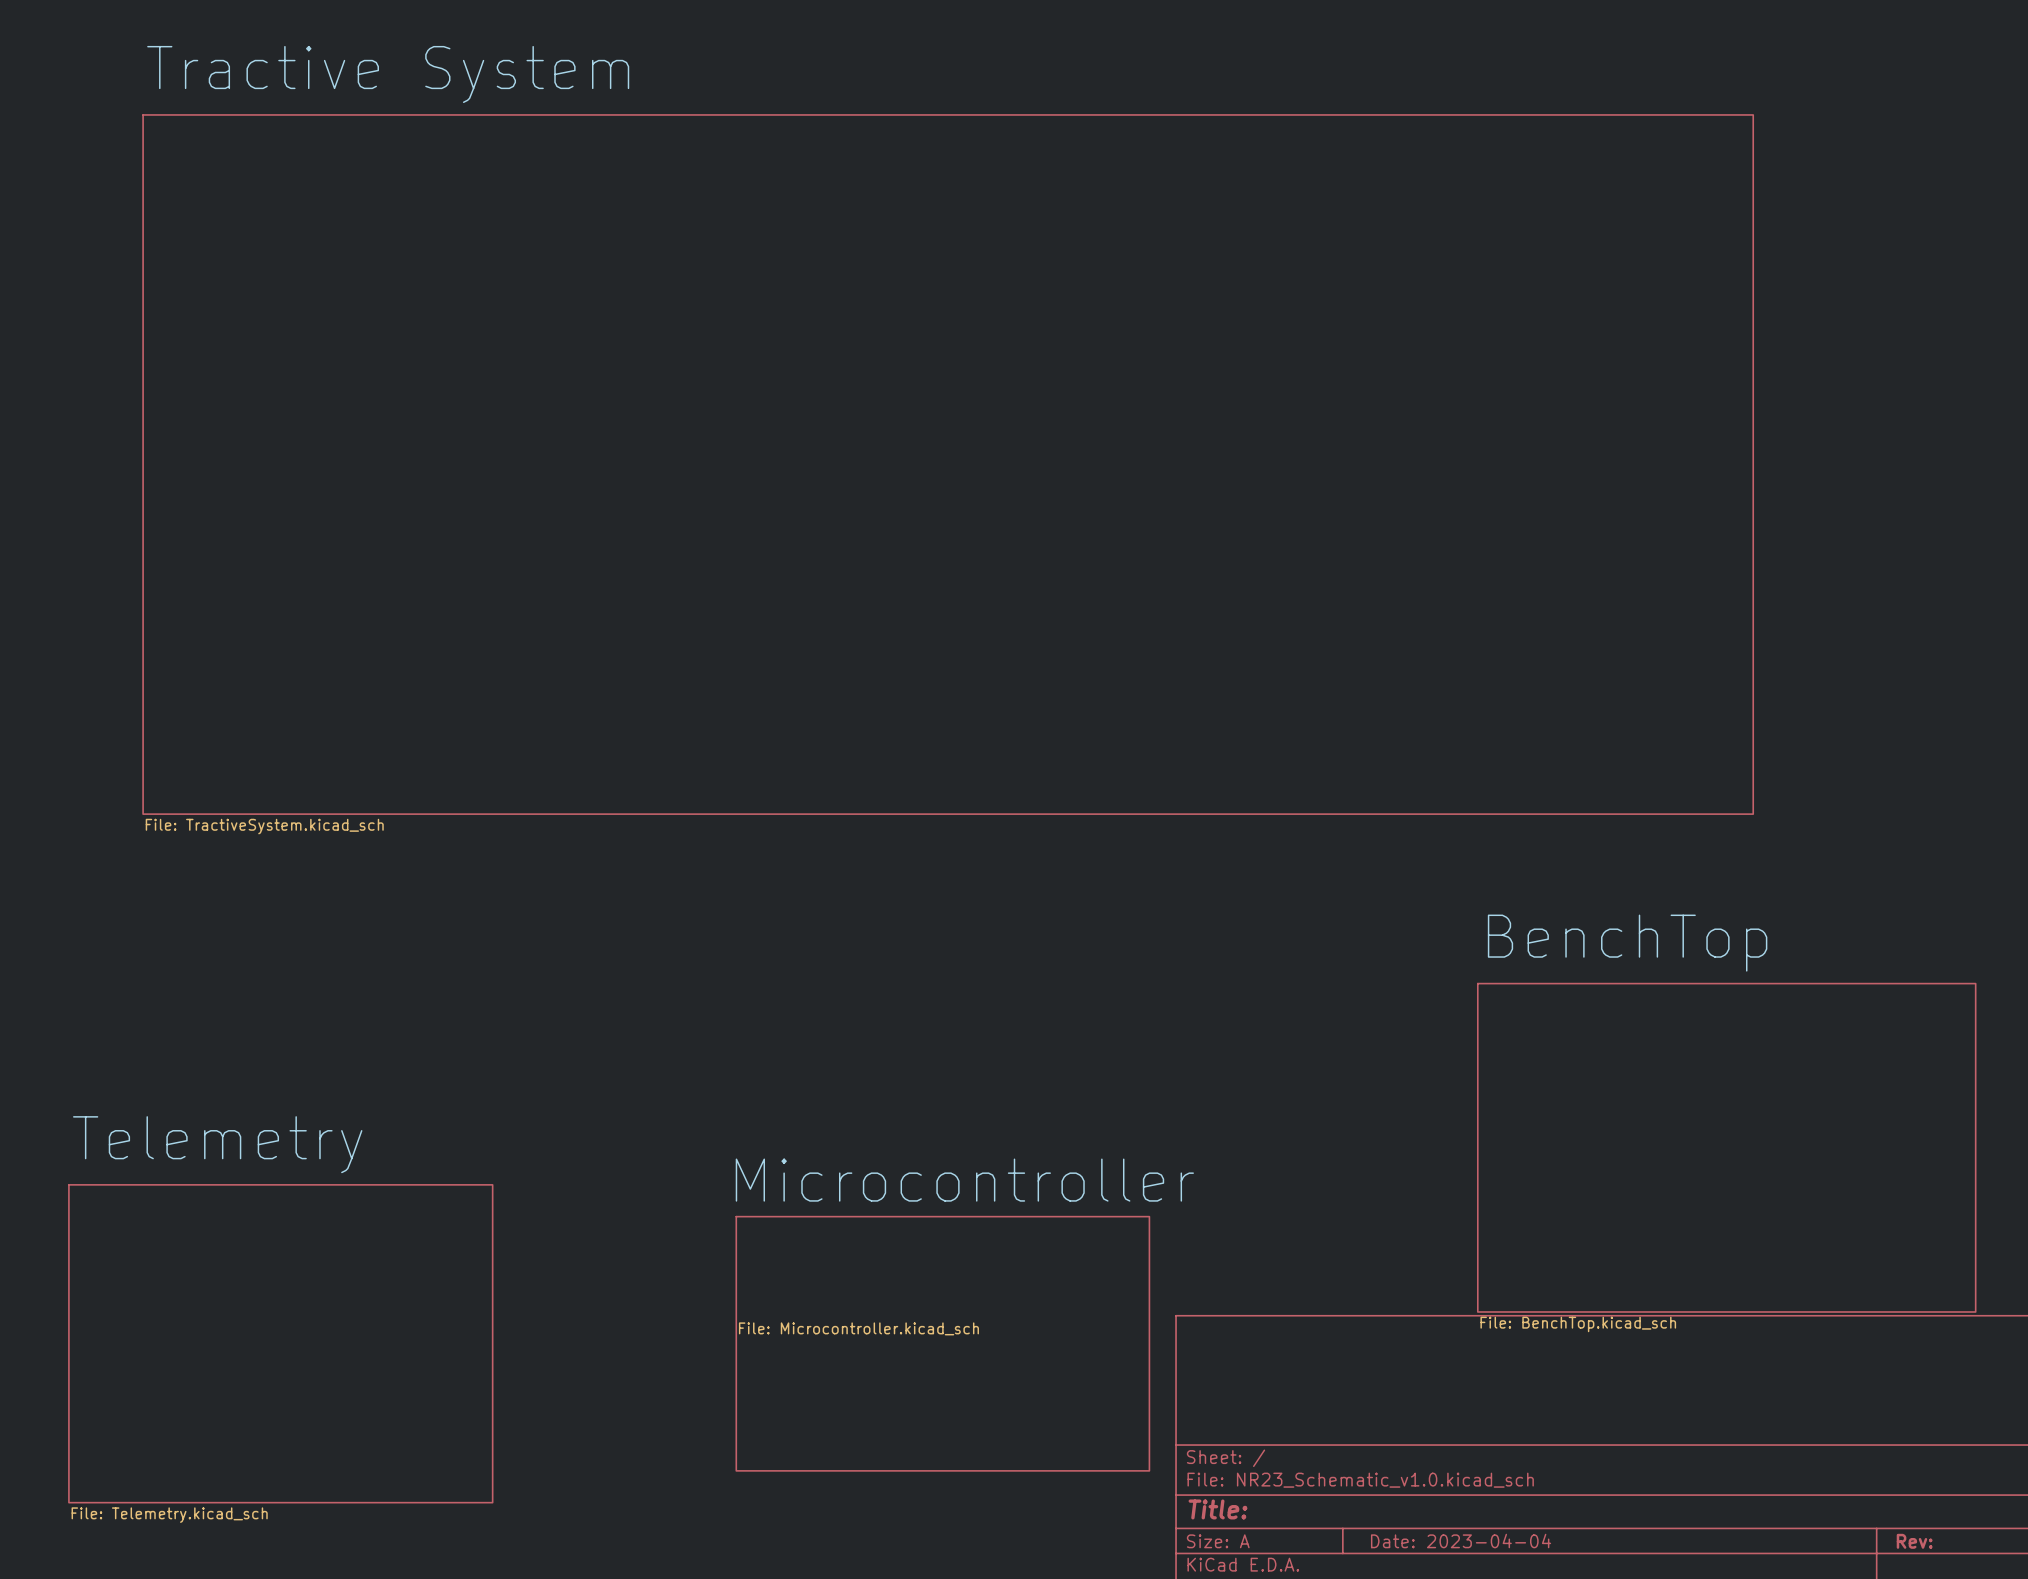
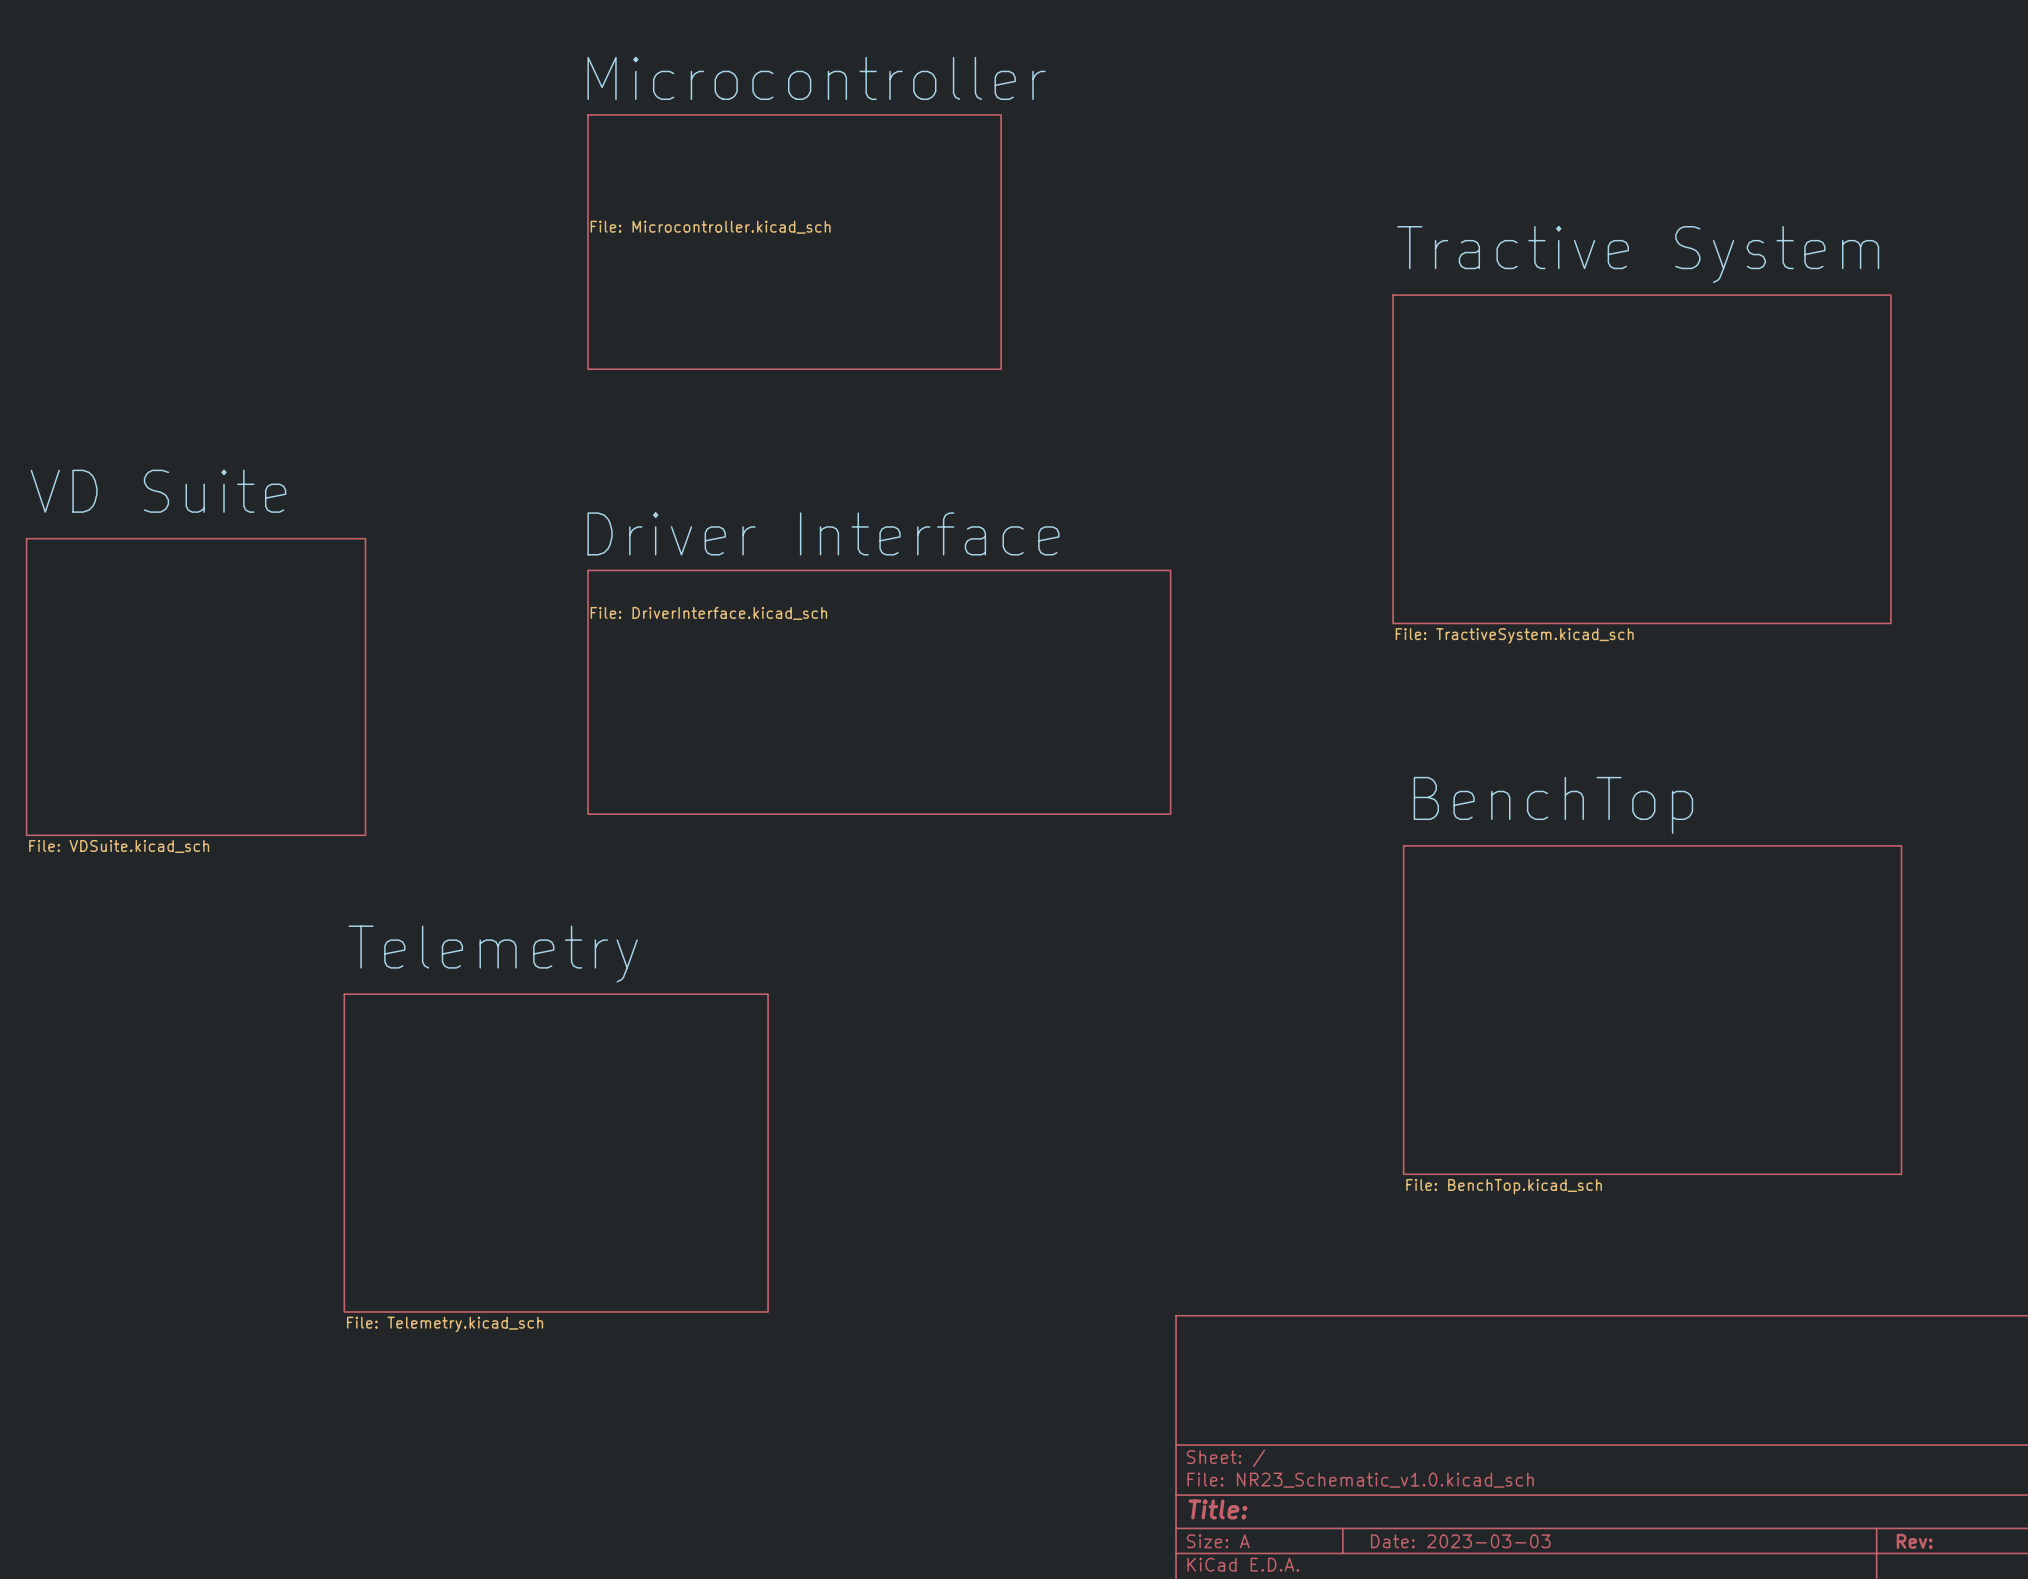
sheet Microcontroller: none -> File: Microcontroller.kicad_sch (794, 242)
sheet Tractive System: none -> File: TractiveSystem.kicad_sch (1641, 459)
sheet Tractive System: File: TractiveSystem.kicad_sch (948, 464) -> none
sheet VD Suite: none -> File: VDSuite.kicad_sch (196, 686)
sheet Driver Interface: none -> File: DriverInterface.kicad_sch (879, 692)
sheet BenchTop position: (1726, 1147) -> (1652, 1010)
sheet Telemetry: none -> File: Telemetry.kicad_sch (556, 1153)
sheet Telemetry: File: Telemetry.kicad_sch (280, 1343) -> none
sheet Microcontroller: File: Microcontroller.kicad_sch (942, 1343) -> none
title block: Date: 2023-04-04 (1461, 1541) -> Date: 2023-03-03 (1460, 1541)

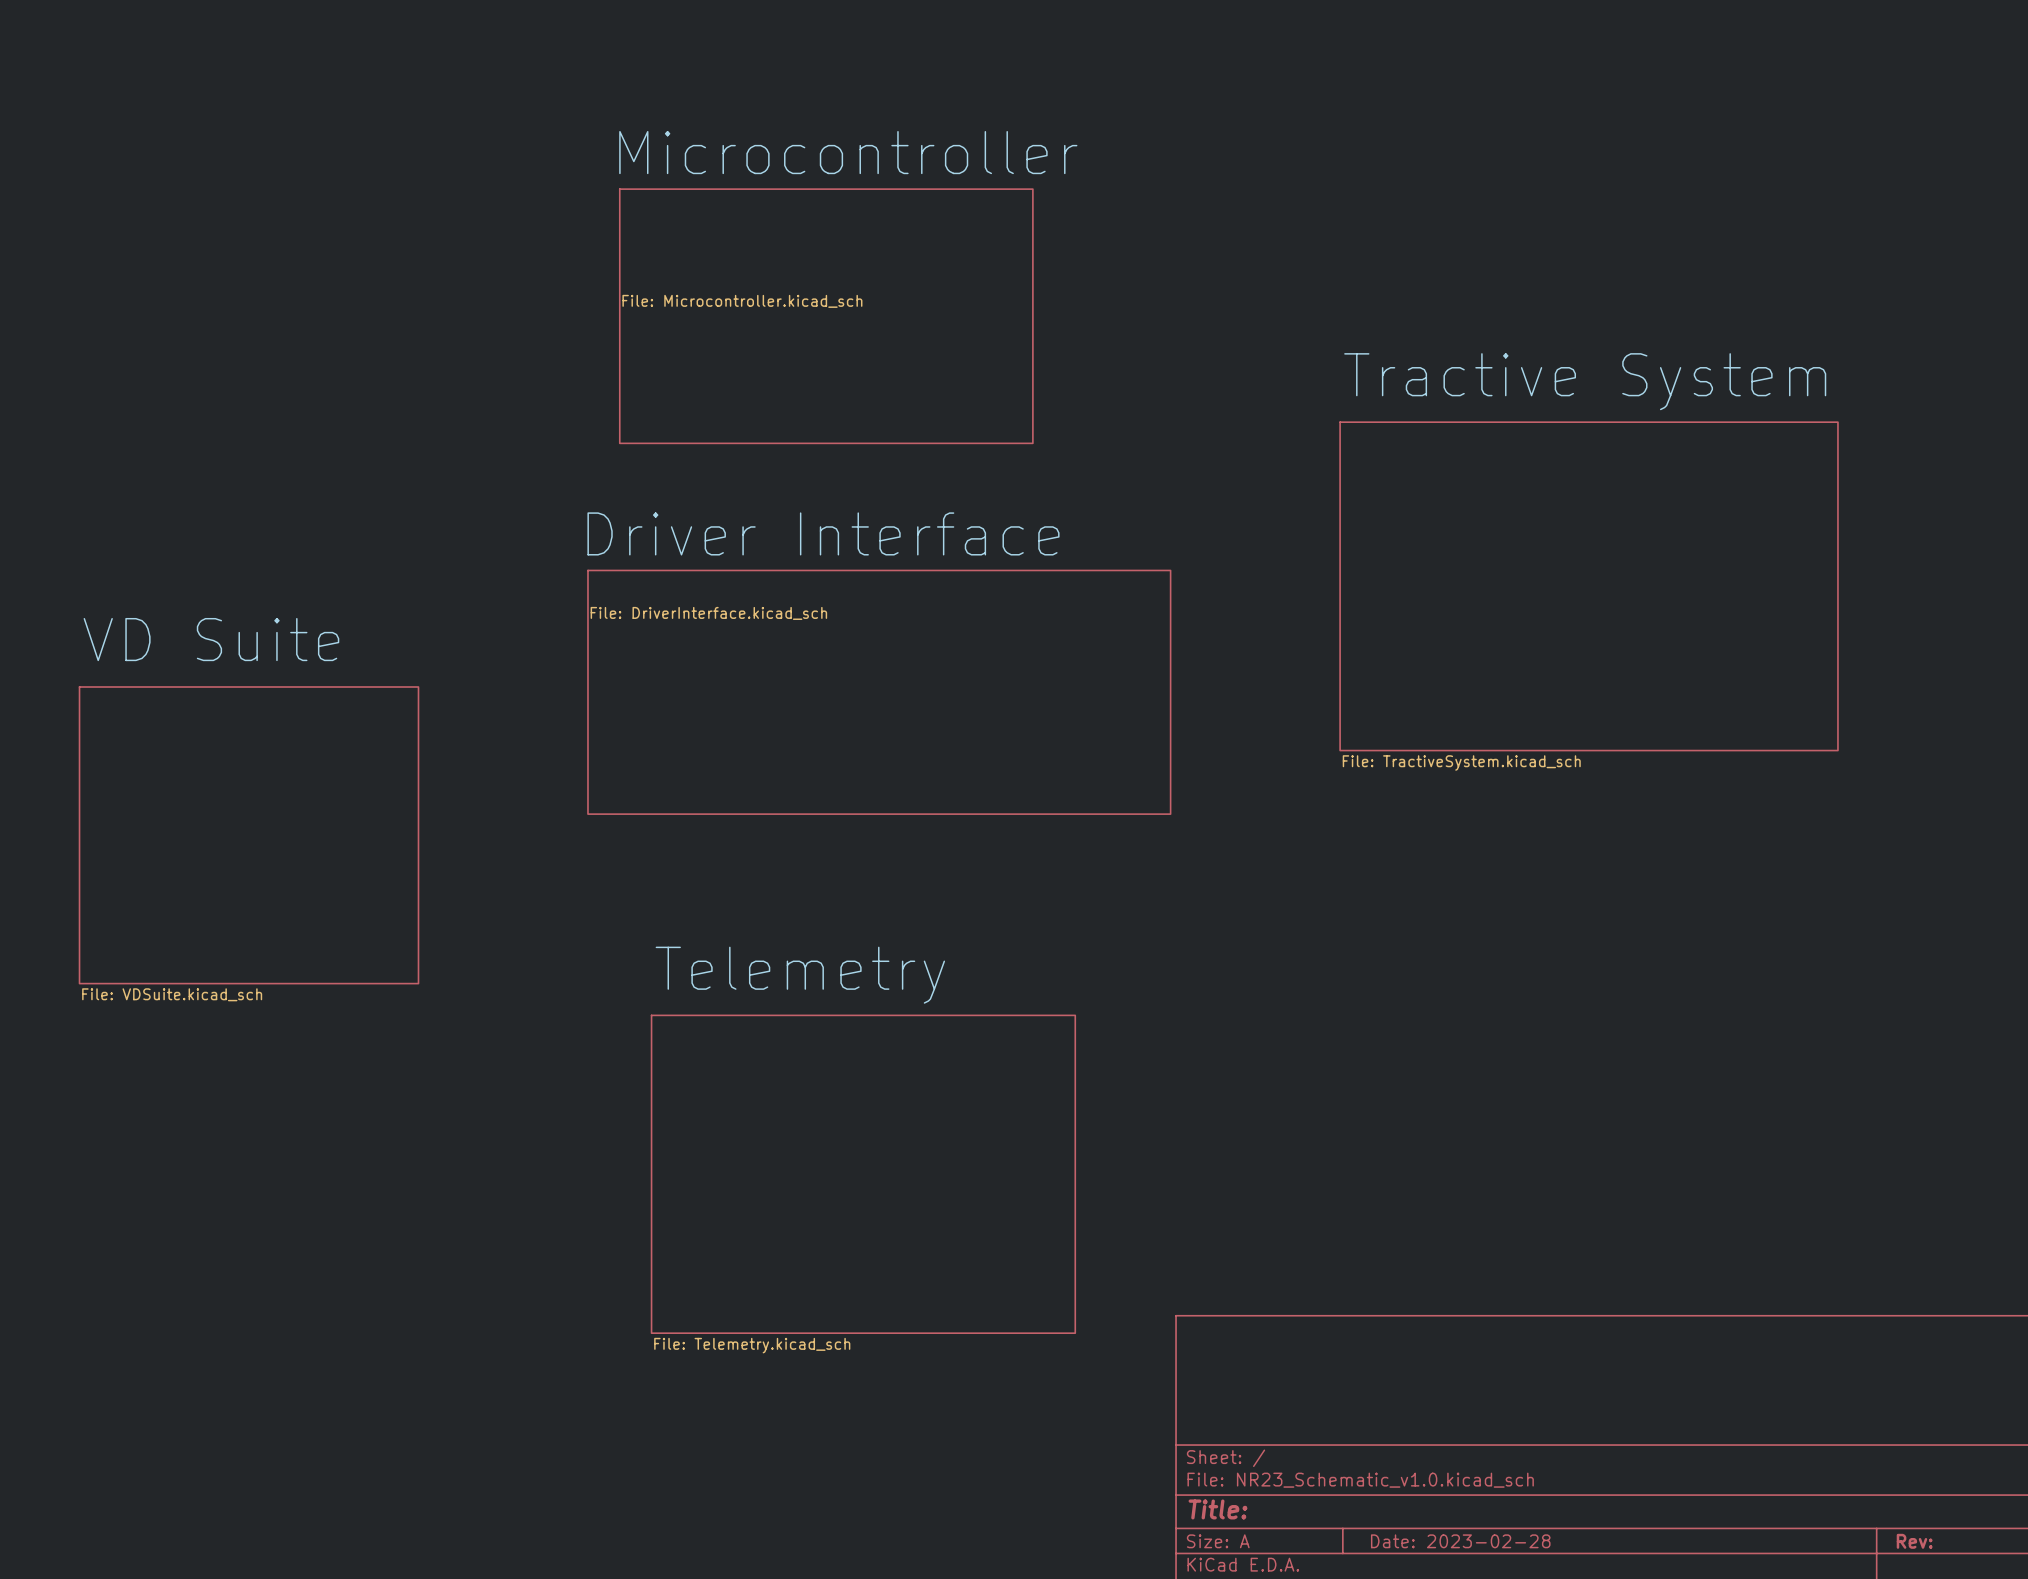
sheet Microcontroller position: (794, 242) -> (826, 316)
sheet Tractive System position: (1641, 459) -> (1589, 586)
sheet VD Suite position: (196, 686) -> (249, 835)
sheet BenchTop: File: BenchTop.kicad_sch (1652, 1010) -> none
sheet Telemetry: File: Telemetry.kicad_sch (556, 1153) -> none
sheet Telemetry: none -> File: Telemetry.kicad_sch (863, 1174)
title block: Date: 2023-03-03 (1460, 1541) -> Date: 2023-02-28 (1460, 1541)

